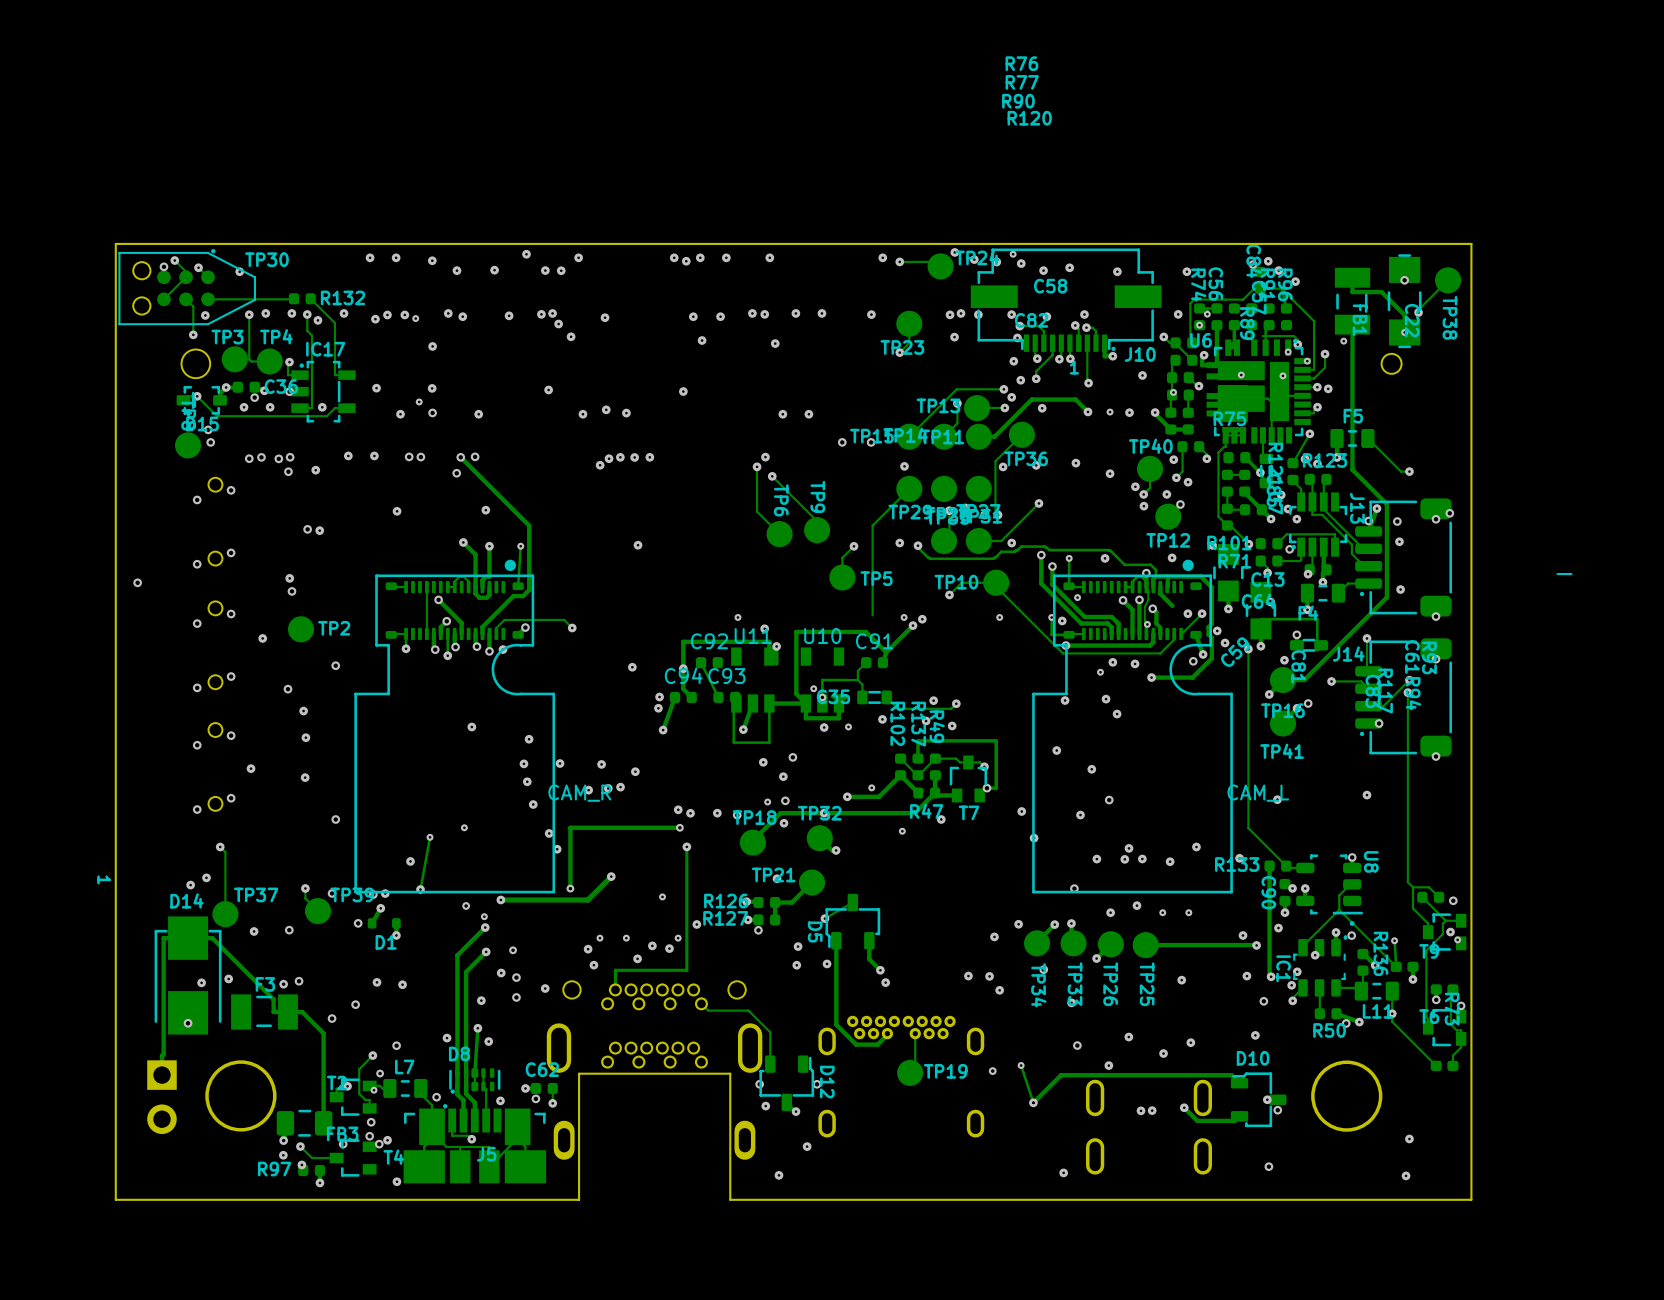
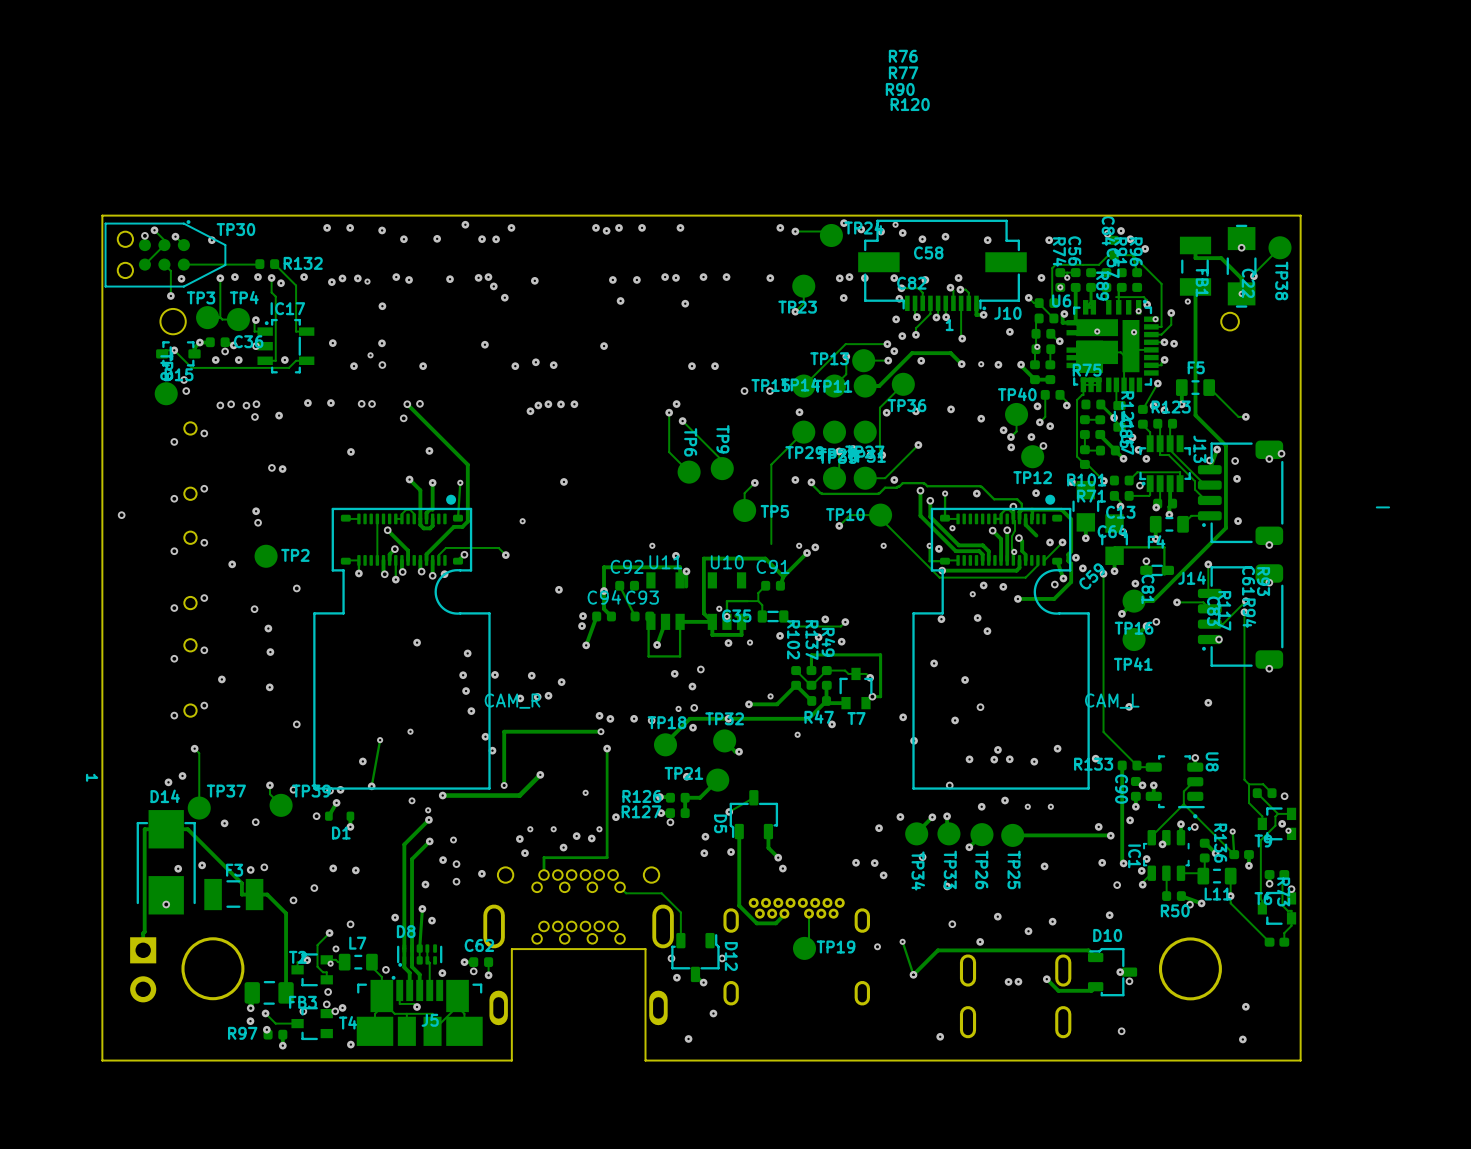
via: none -> (522, 521)

